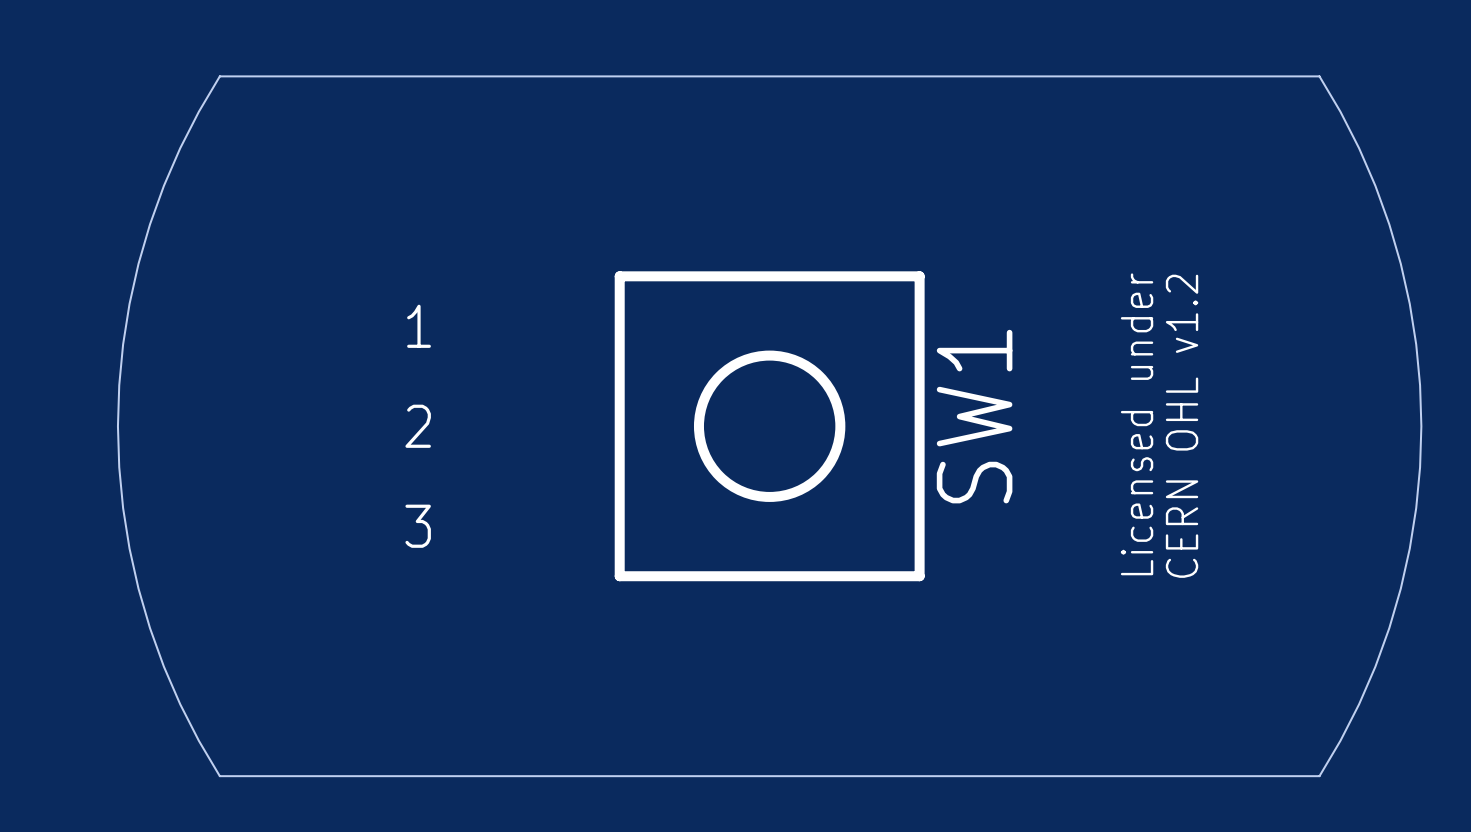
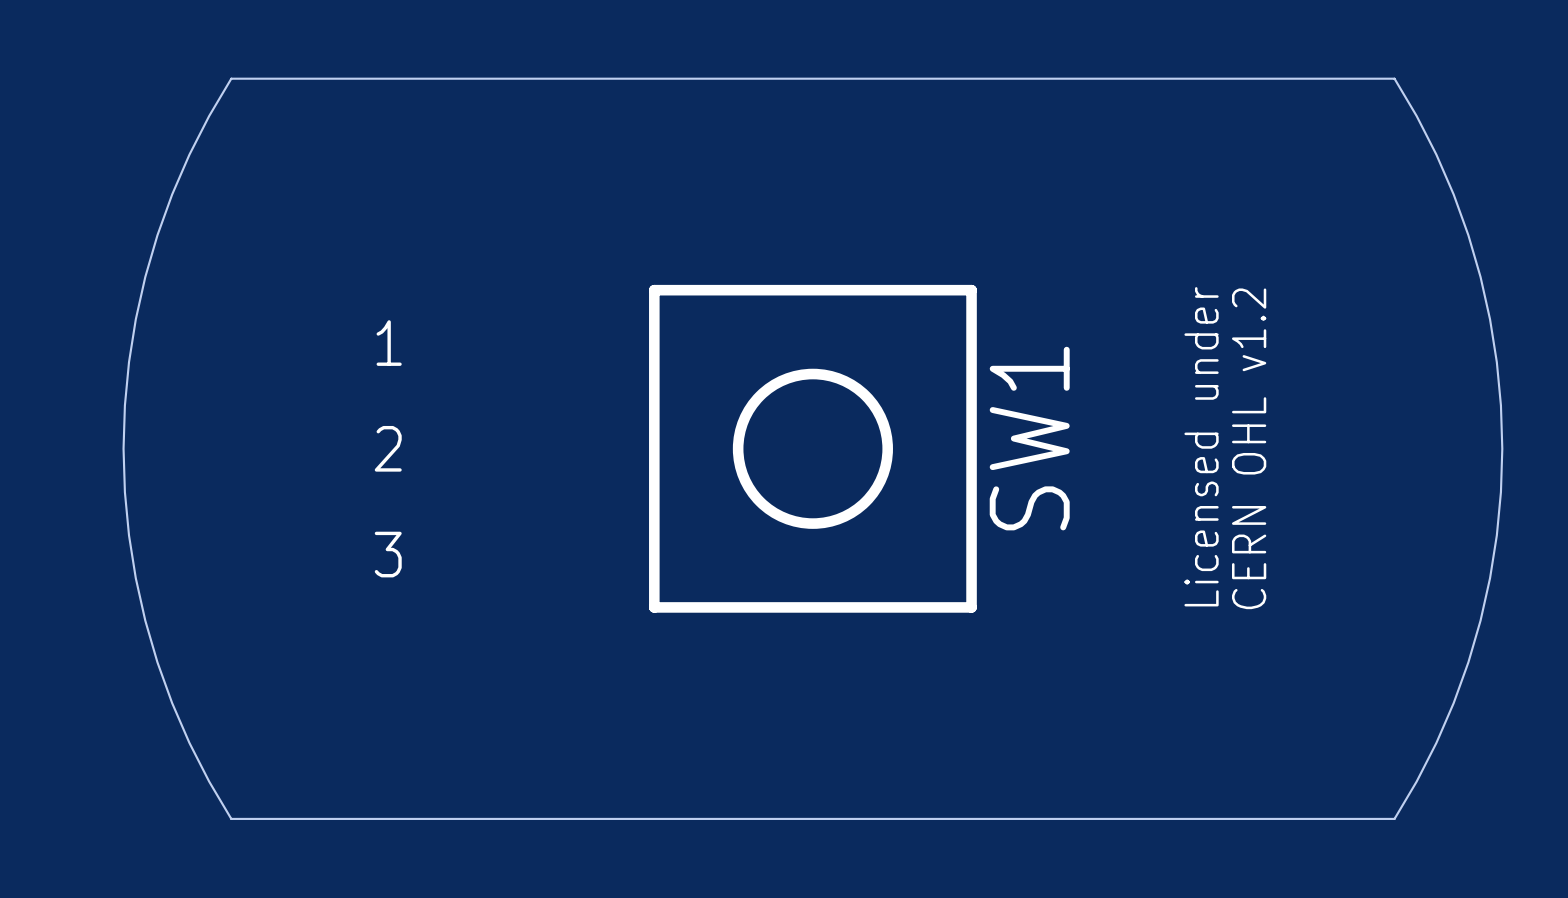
text position: 1 (419, 326) -> 1 (389, 343)
text position: 2 (418, 426) -> 2 (388, 448)
text position: 3 (418, 526) -> 3 (388, 554)

